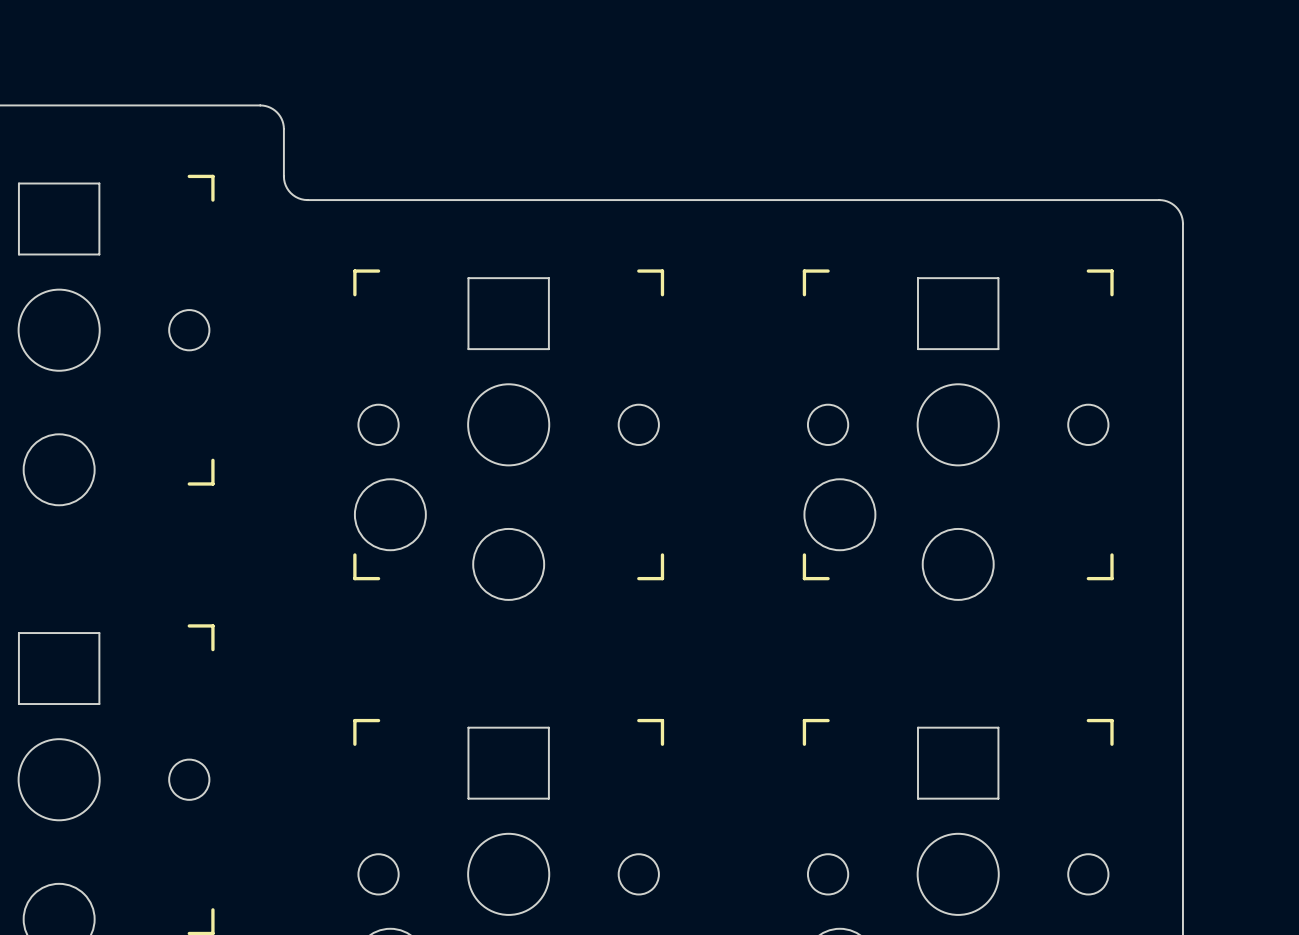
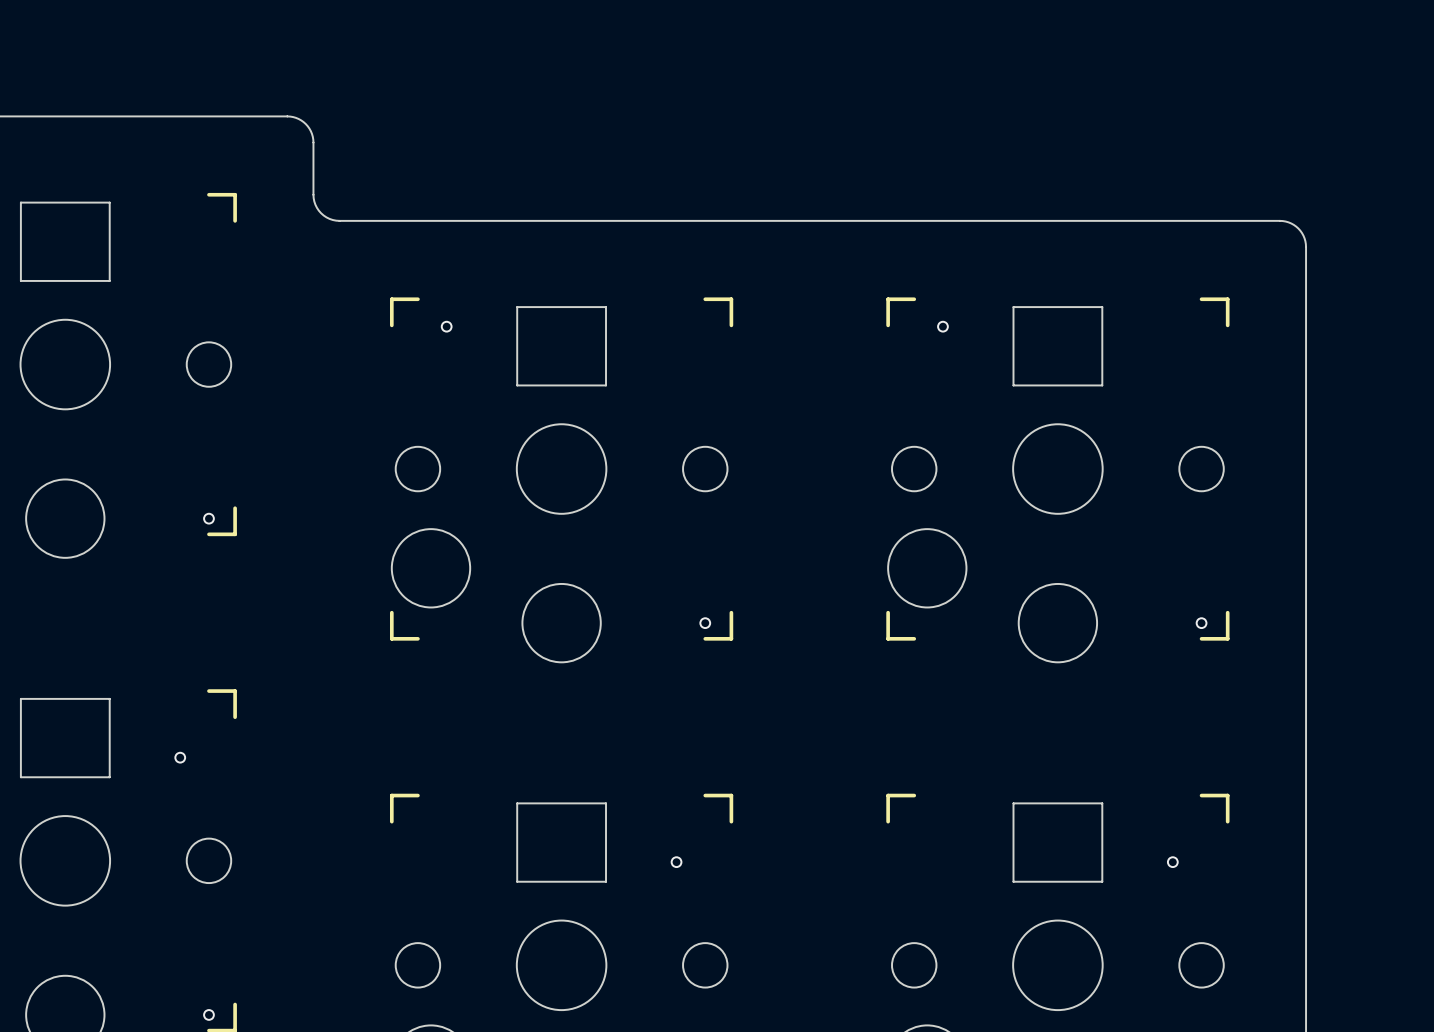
via: none -> (446, 326)
via: none -> (942, 326)
via: none -> (208, 518)
via: none -> (705, 623)
via: none -> (1201, 623)
via: none -> (180, 757)
via: none -> (676, 862)
via: none -> (1172, 862)
via: none -> (208, 1014)

